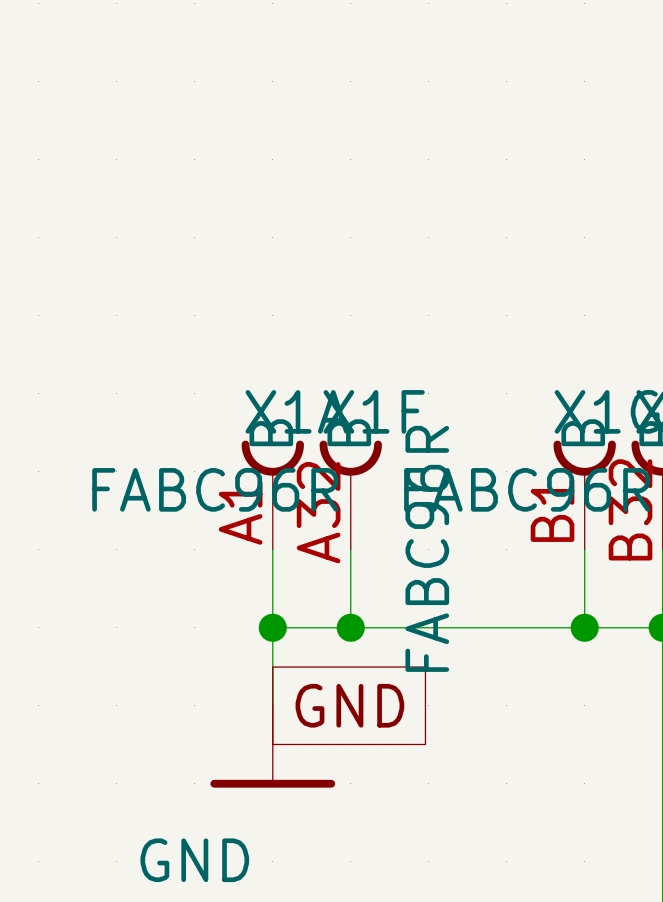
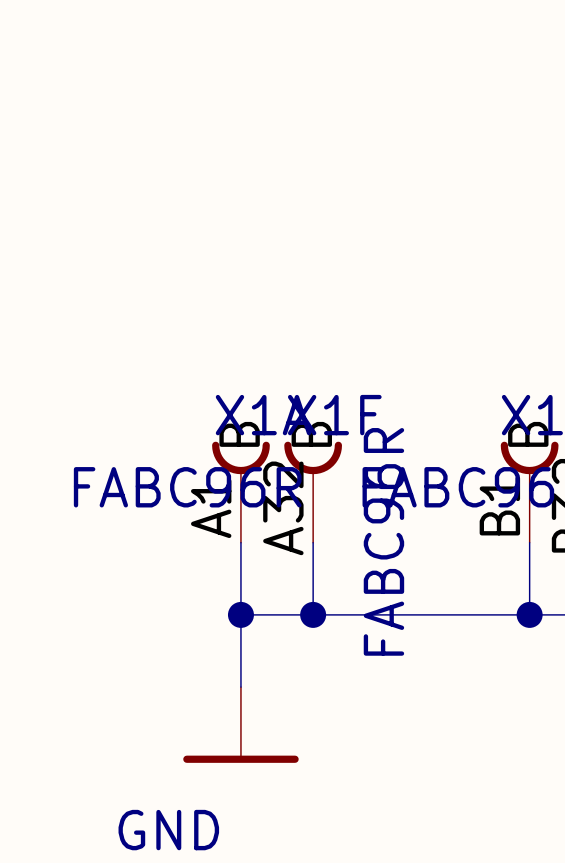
global label: GND (349, 705) -> none

